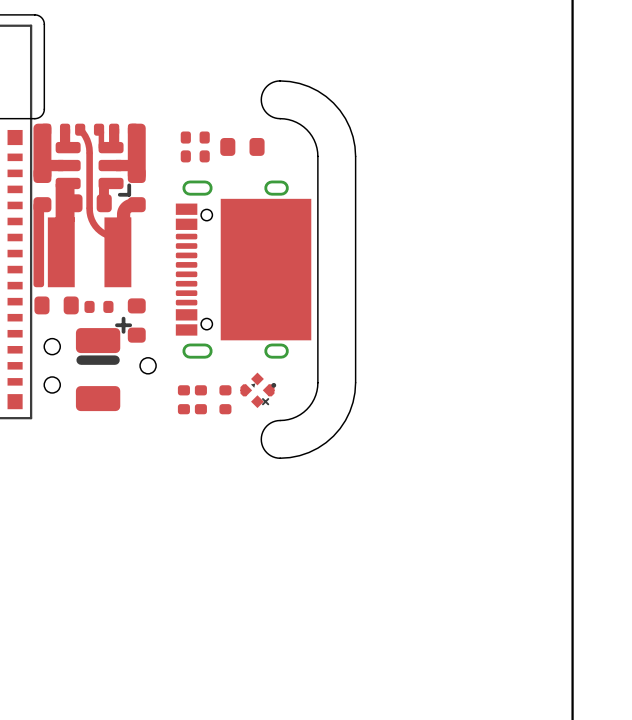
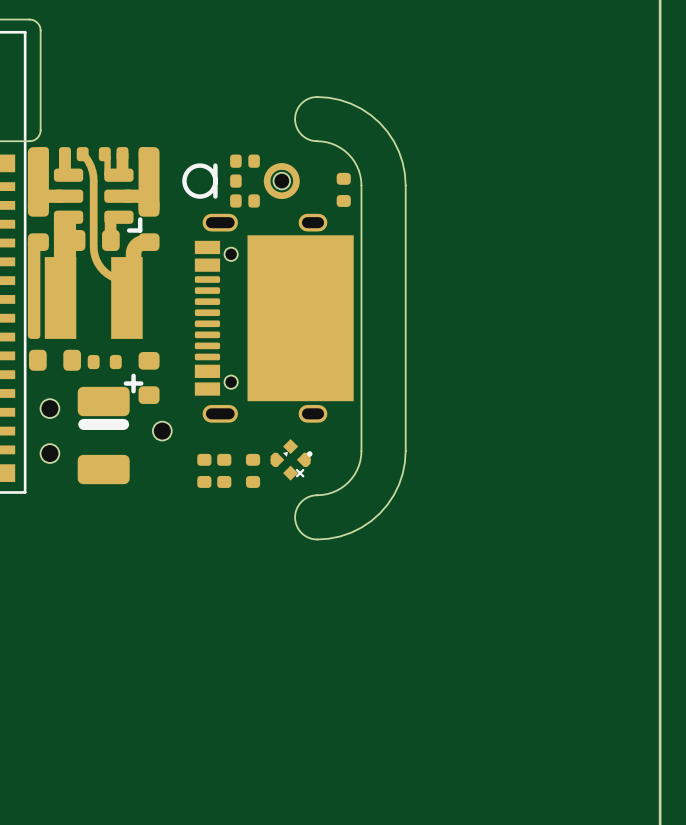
drawing: none -> [182, 163, 218, 199]
part: (195, 137) -> none
part footprint: [220, 137, 265, 156] -> [230, 154, 300, 208]
line: none -> (215, 165) (215, 196)
part rotation: 0° (195, 156) -> 90° clockwise (343, 189)
part position: (195, 156) -> (343, 189)

